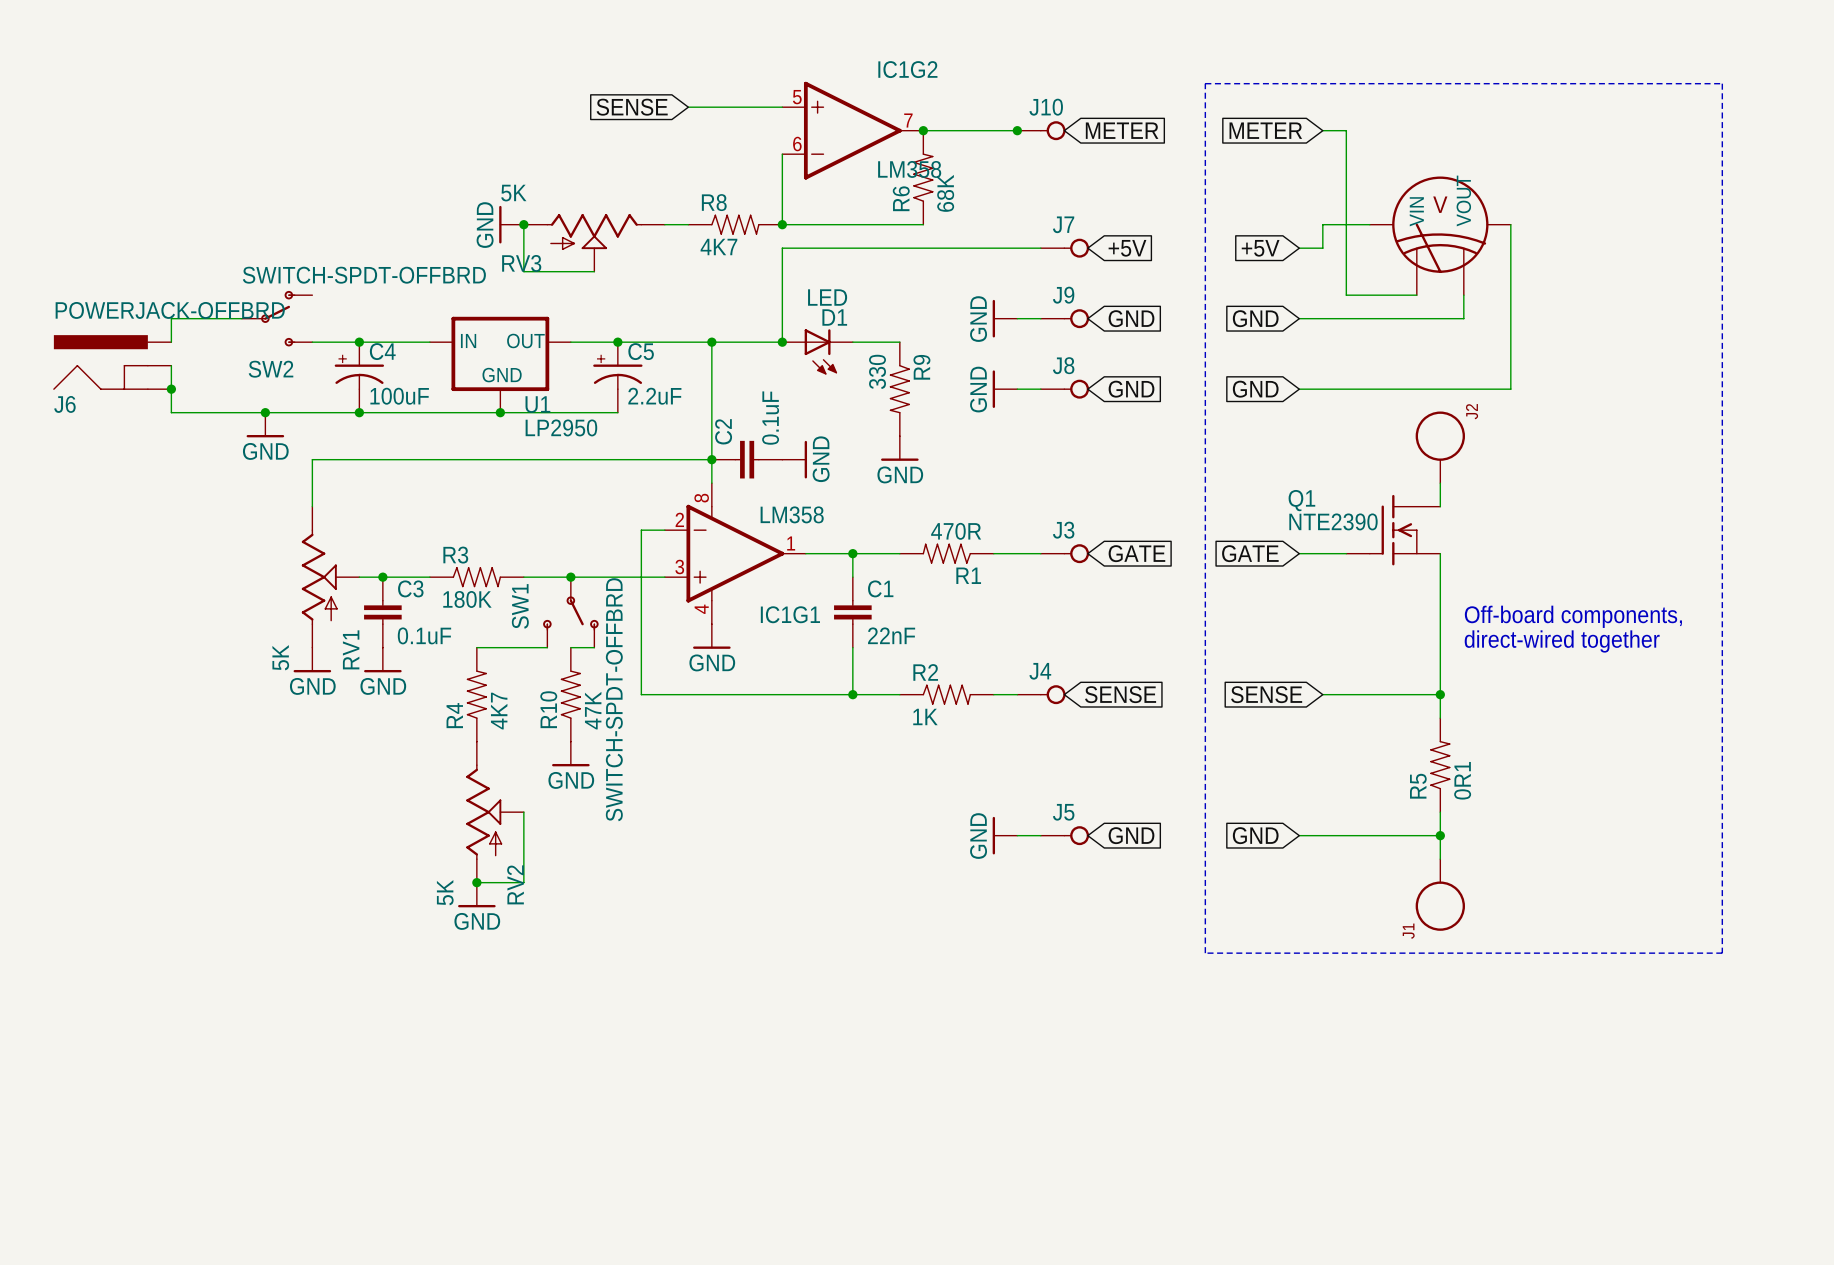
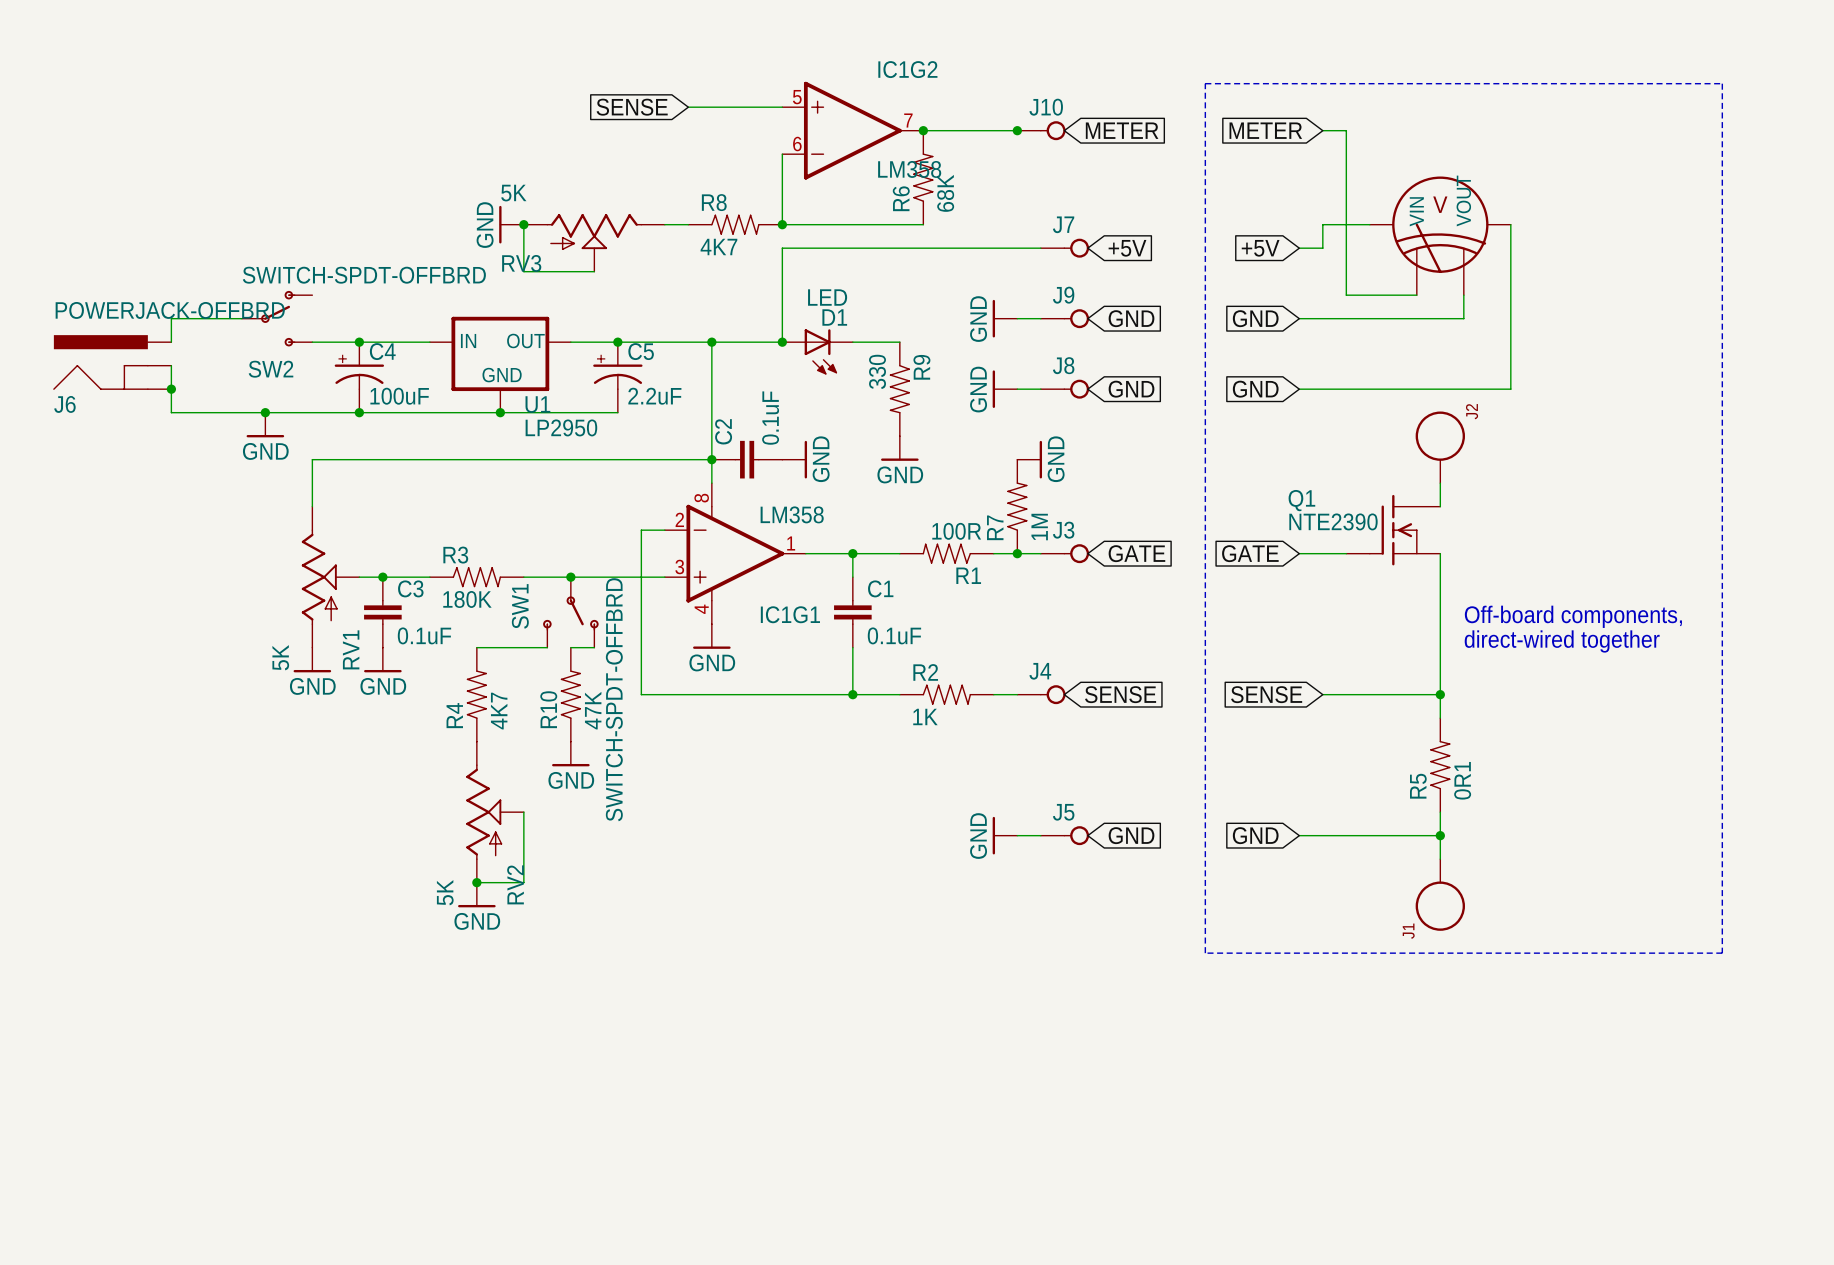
power symbol: none -> GND (1029, 459)
R7: none -> 1M (1017, 506)
R1 value: 470R (956, 531) -> 100R (956, 531)
junction: none -> (1017, 553)
C1 value: 22nF (891, 635) -> 0.1uF (894, 635)

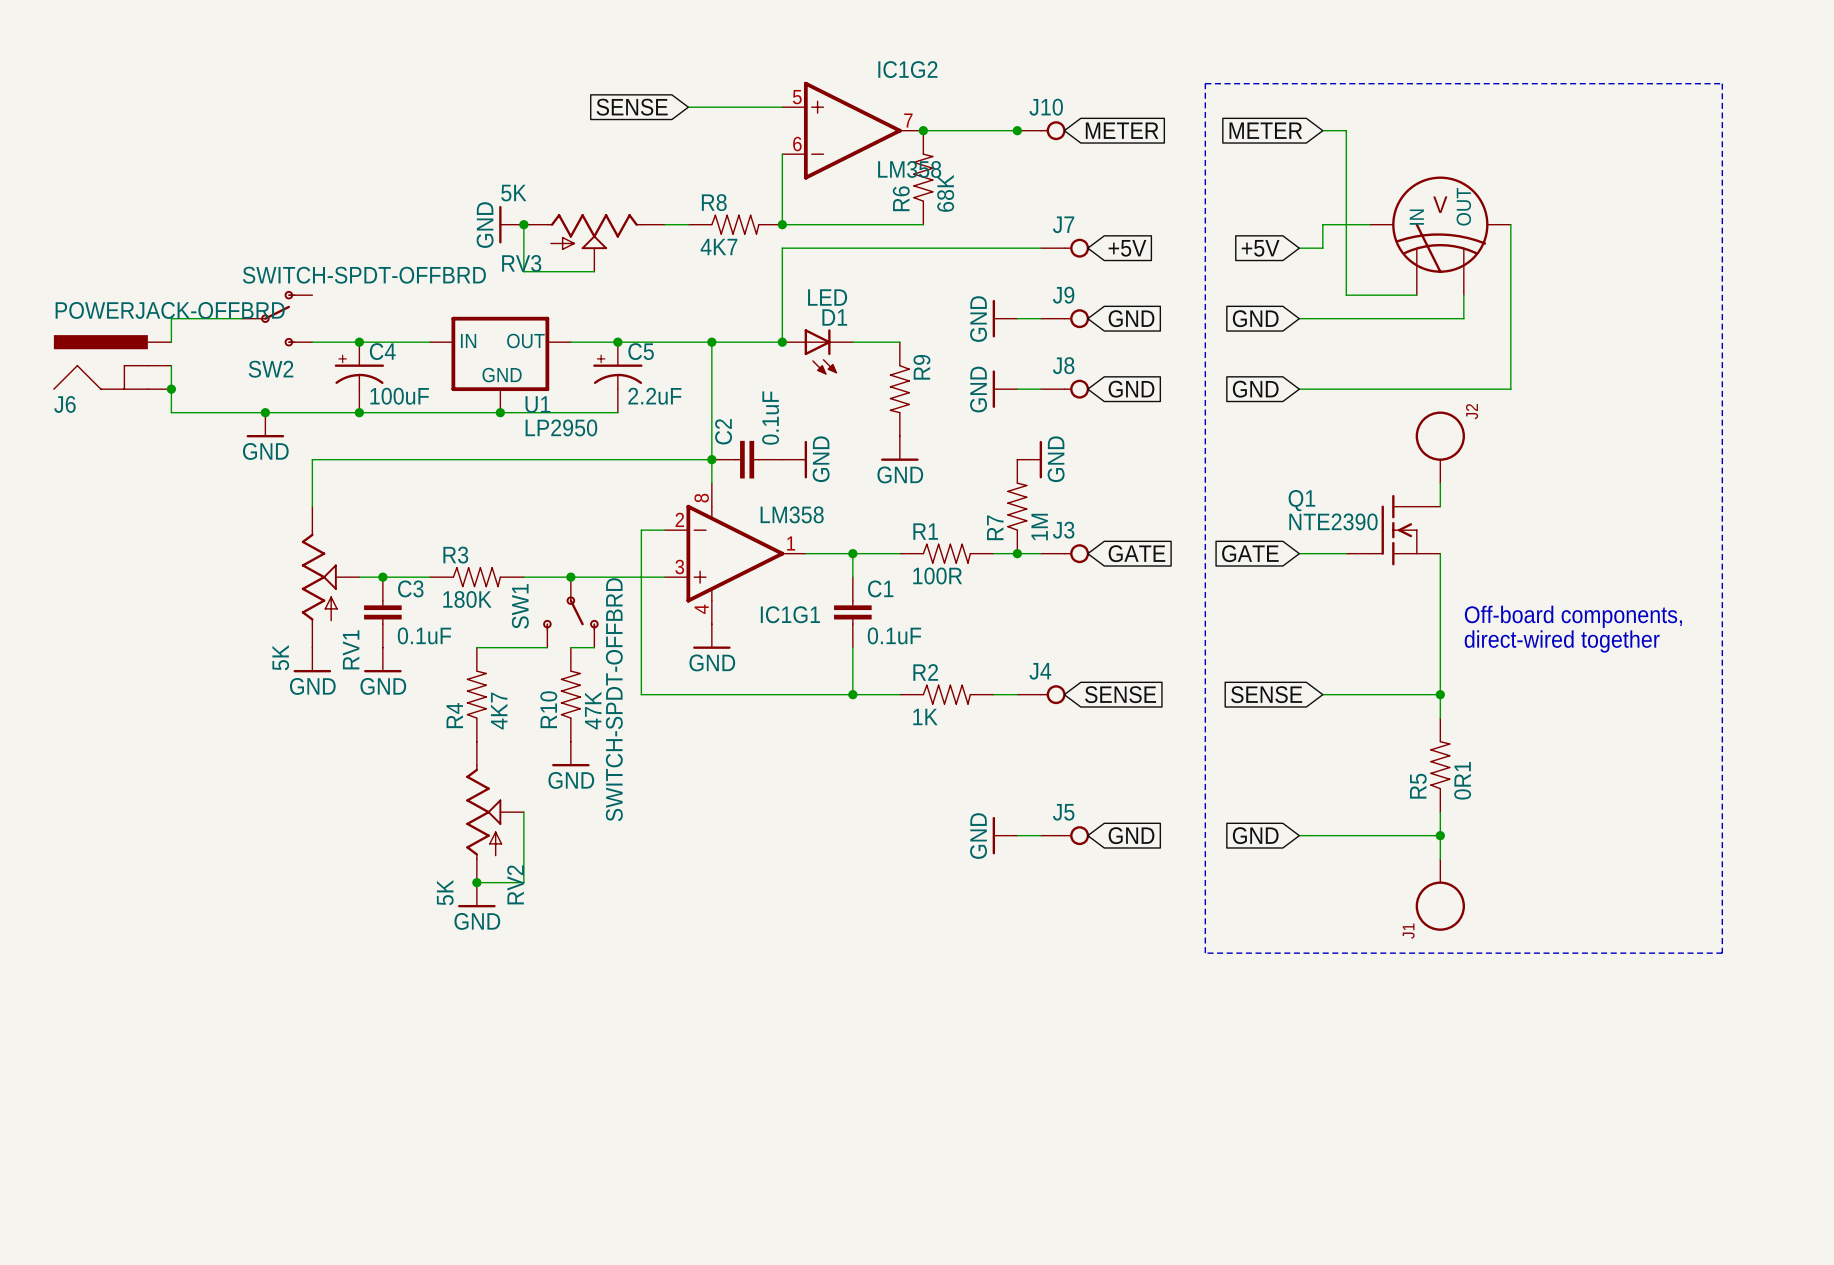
part pin name: VOUT (1463, 200) -> OUT (1463, 206)
part pin name: VIN (1416, 211) -> IN (1416, 217)
R9 value: 330 (877, 371) -> none
R1 rotation: 0° (946, 553) -> 180° (946, 553)

